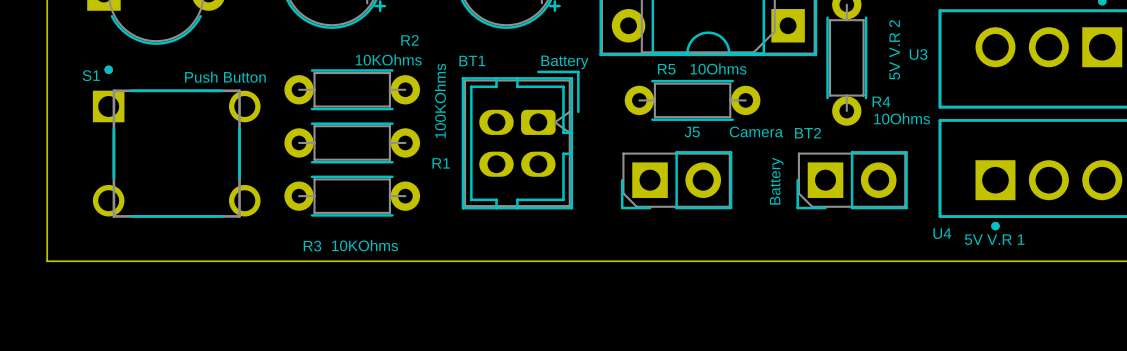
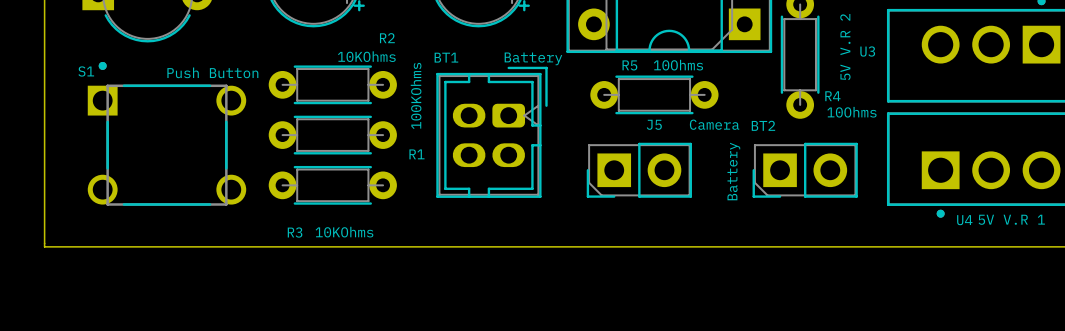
U4 name position: U4 (942, 233) -> U4 (964, 220)
U4 value position: 5V V.R 1 (994, 239) -> 5V V.R 1 (1011, 219)

